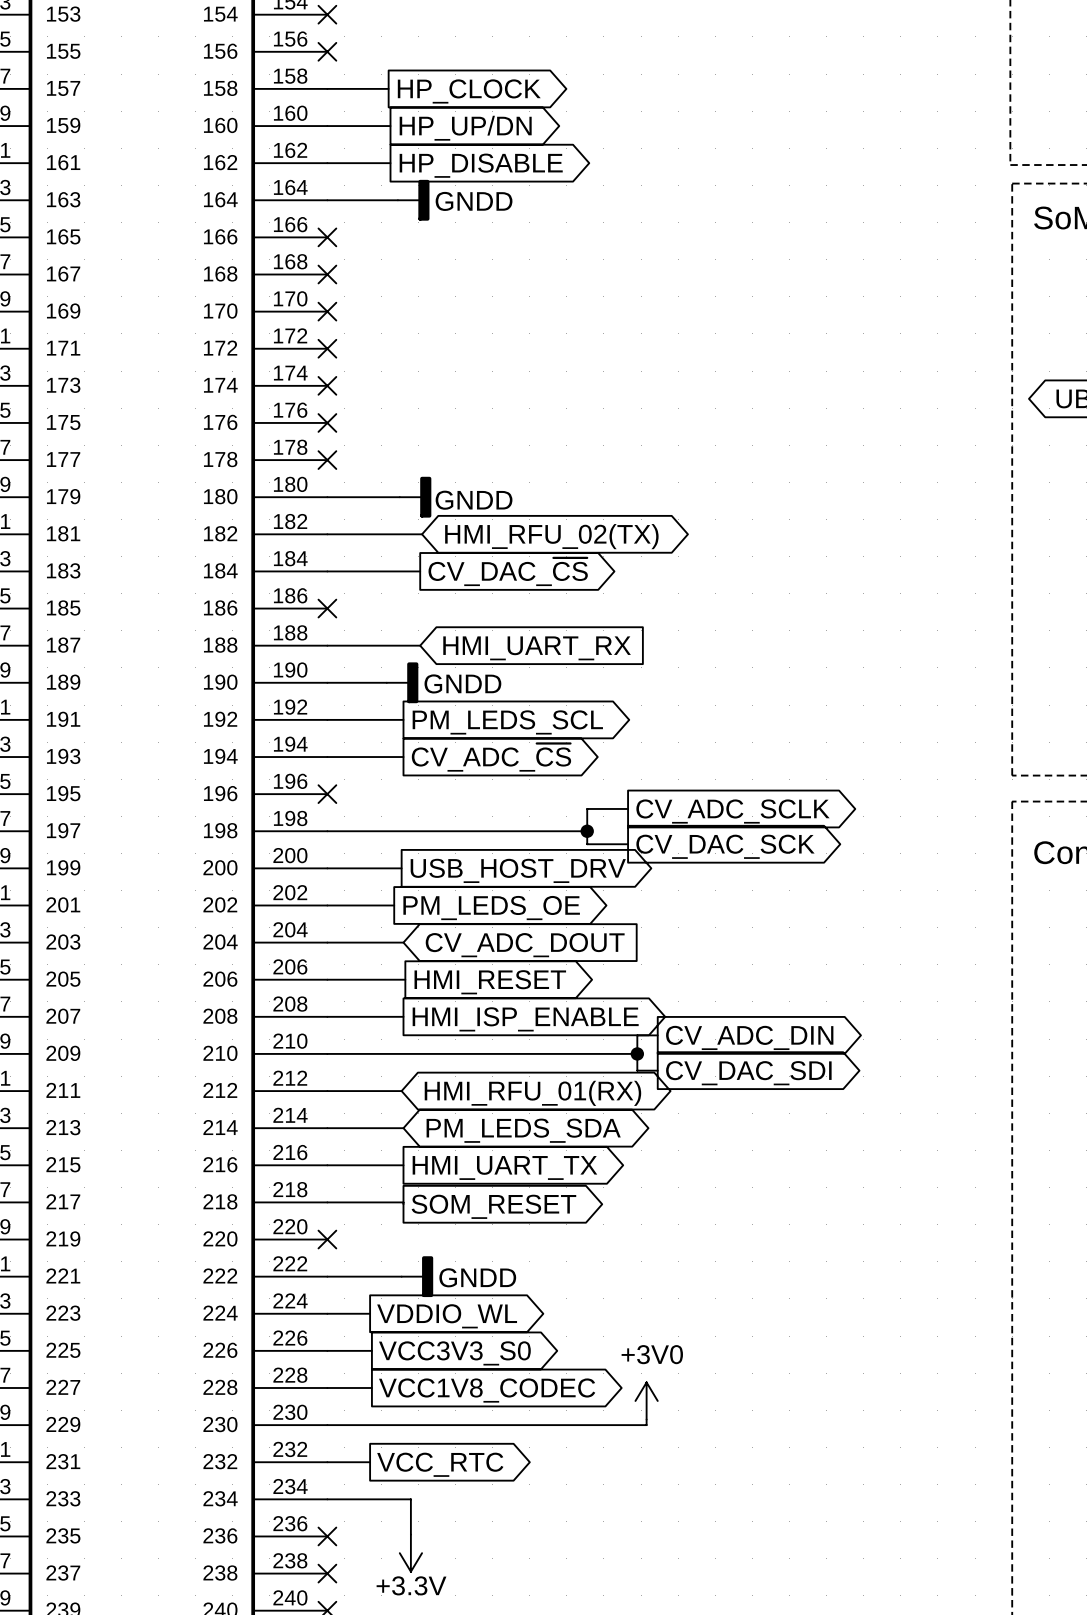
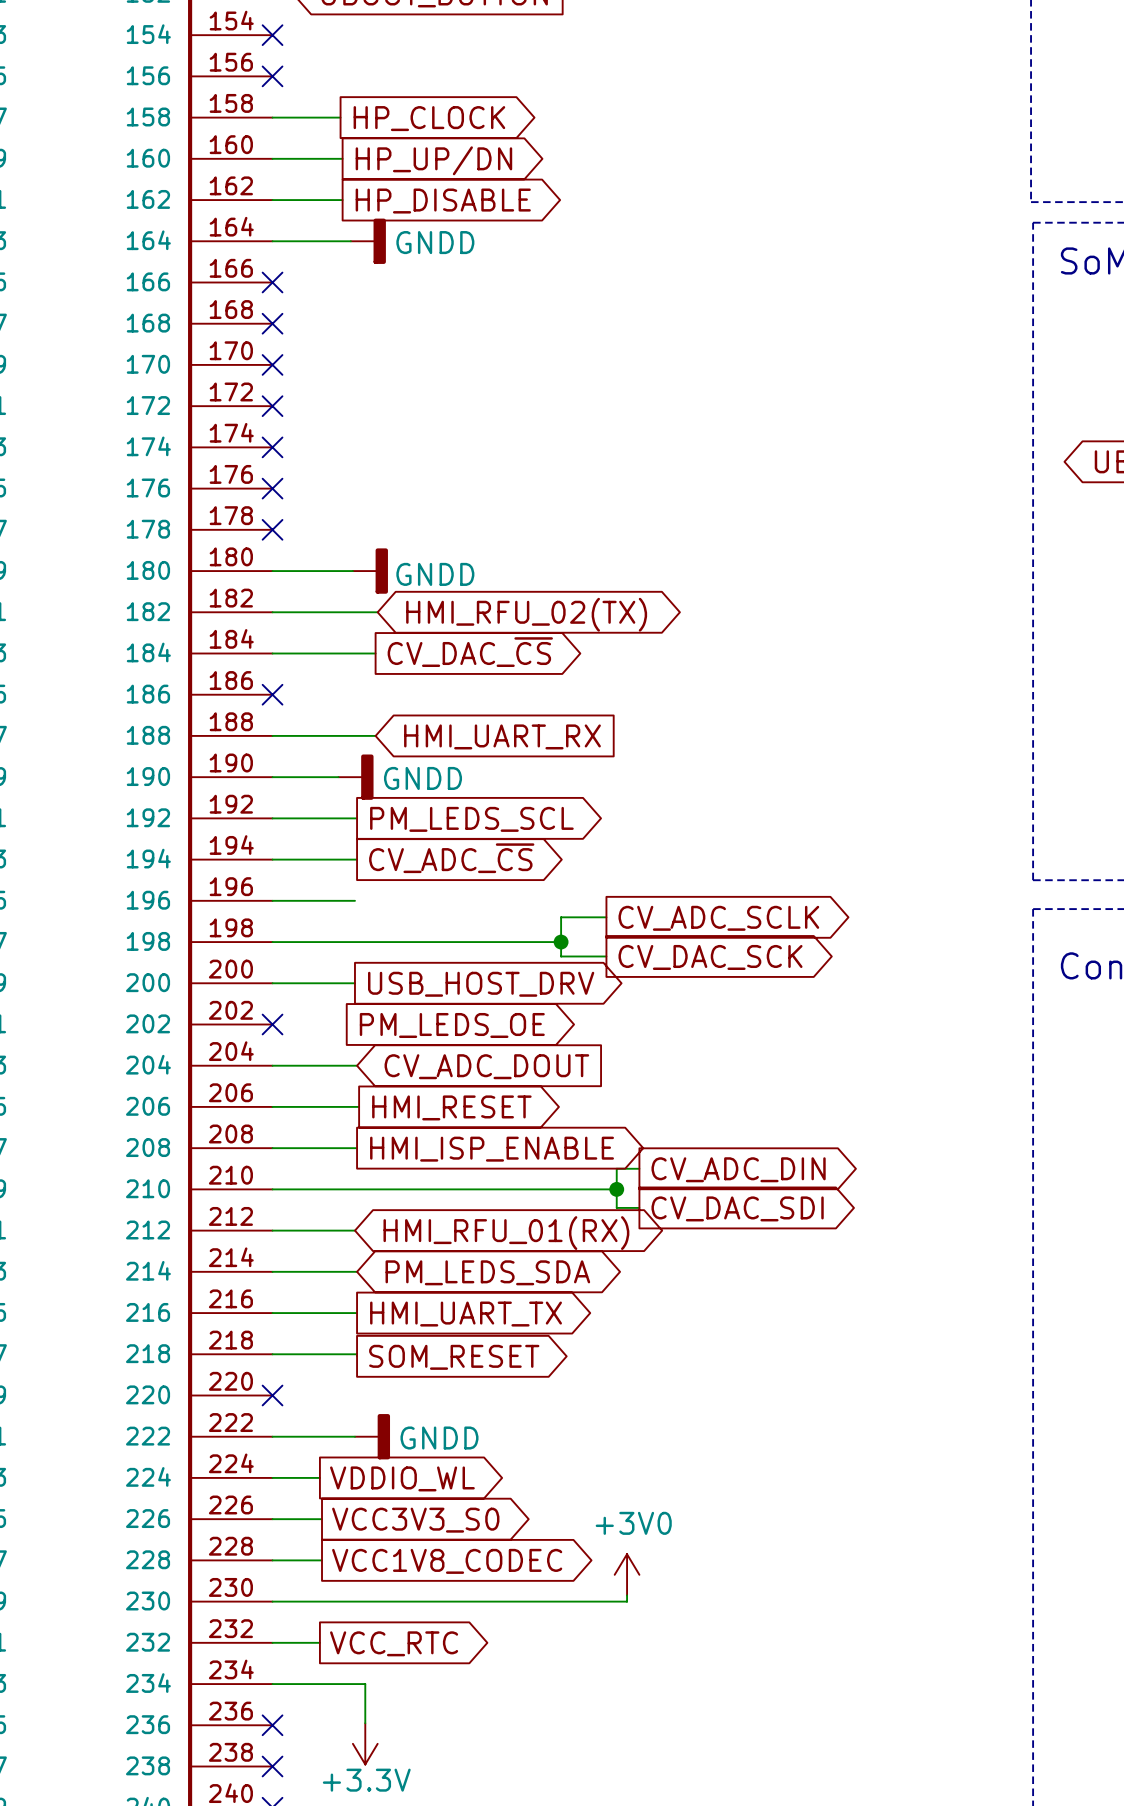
wire: none -> (272, 900) (354, 900)
no-connect mark: (327, 794) -> none
wire: (327, 905) (394, 905) -> none
no-connect mark: none -> (272, 1024)

